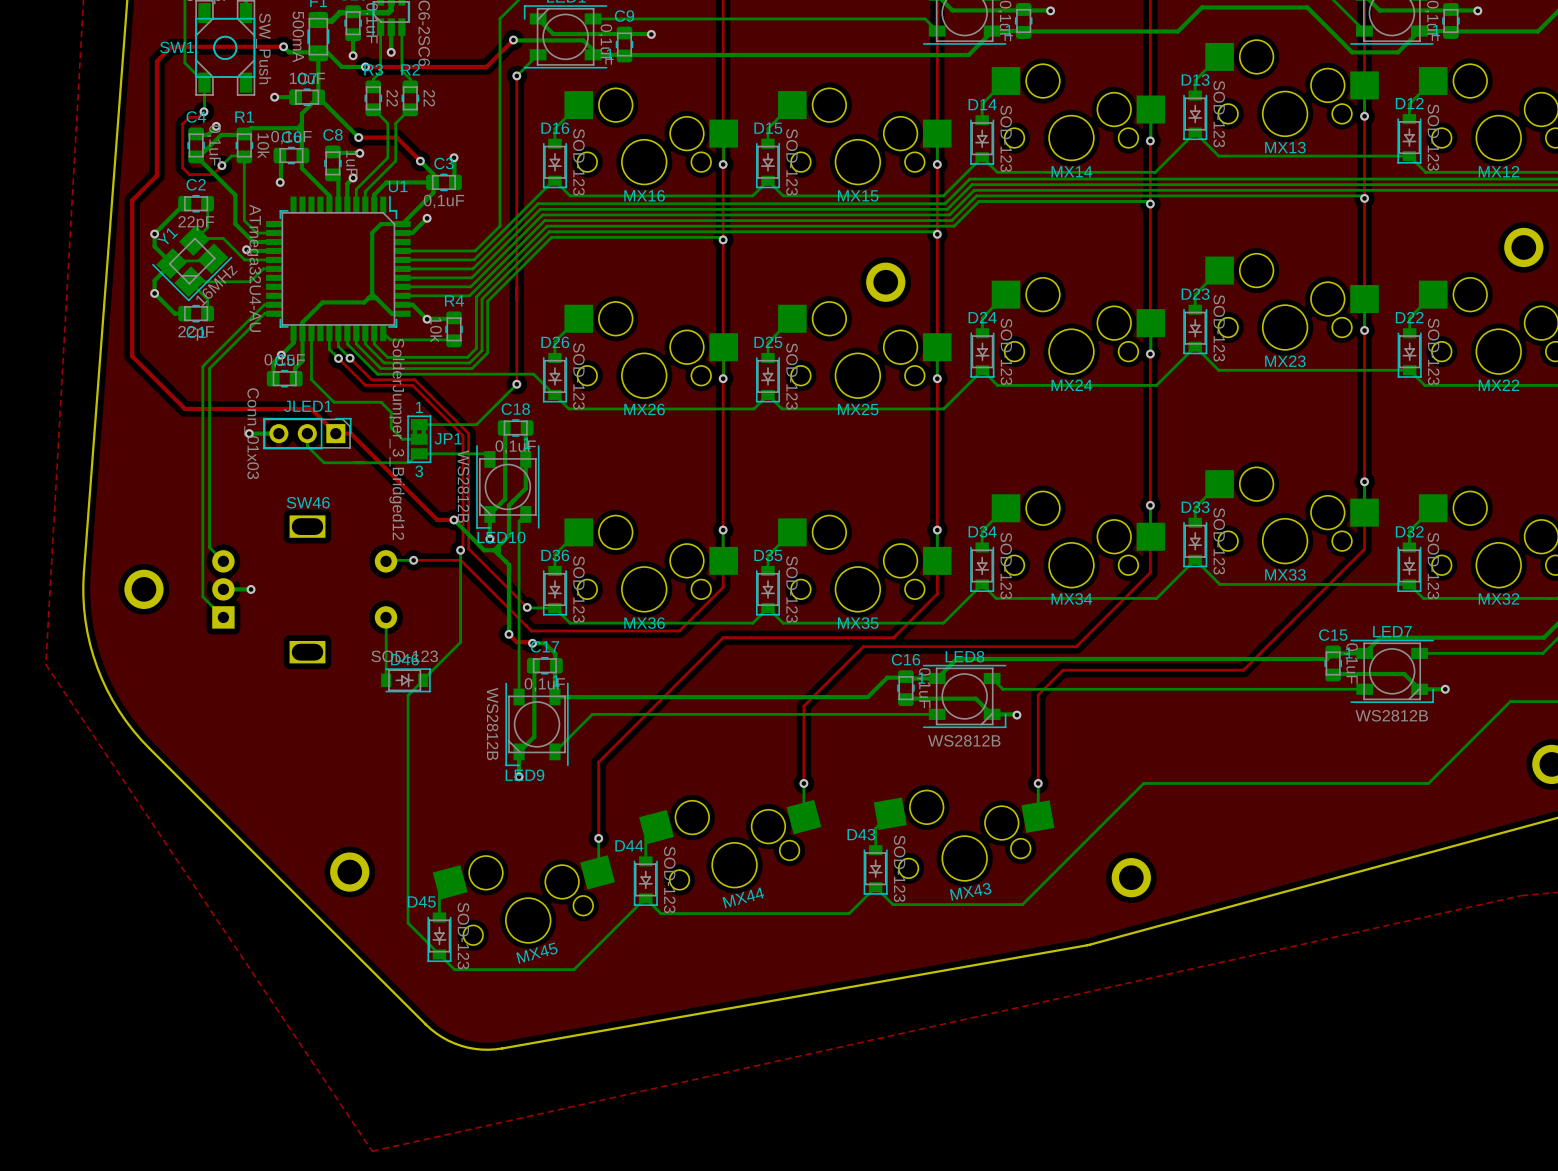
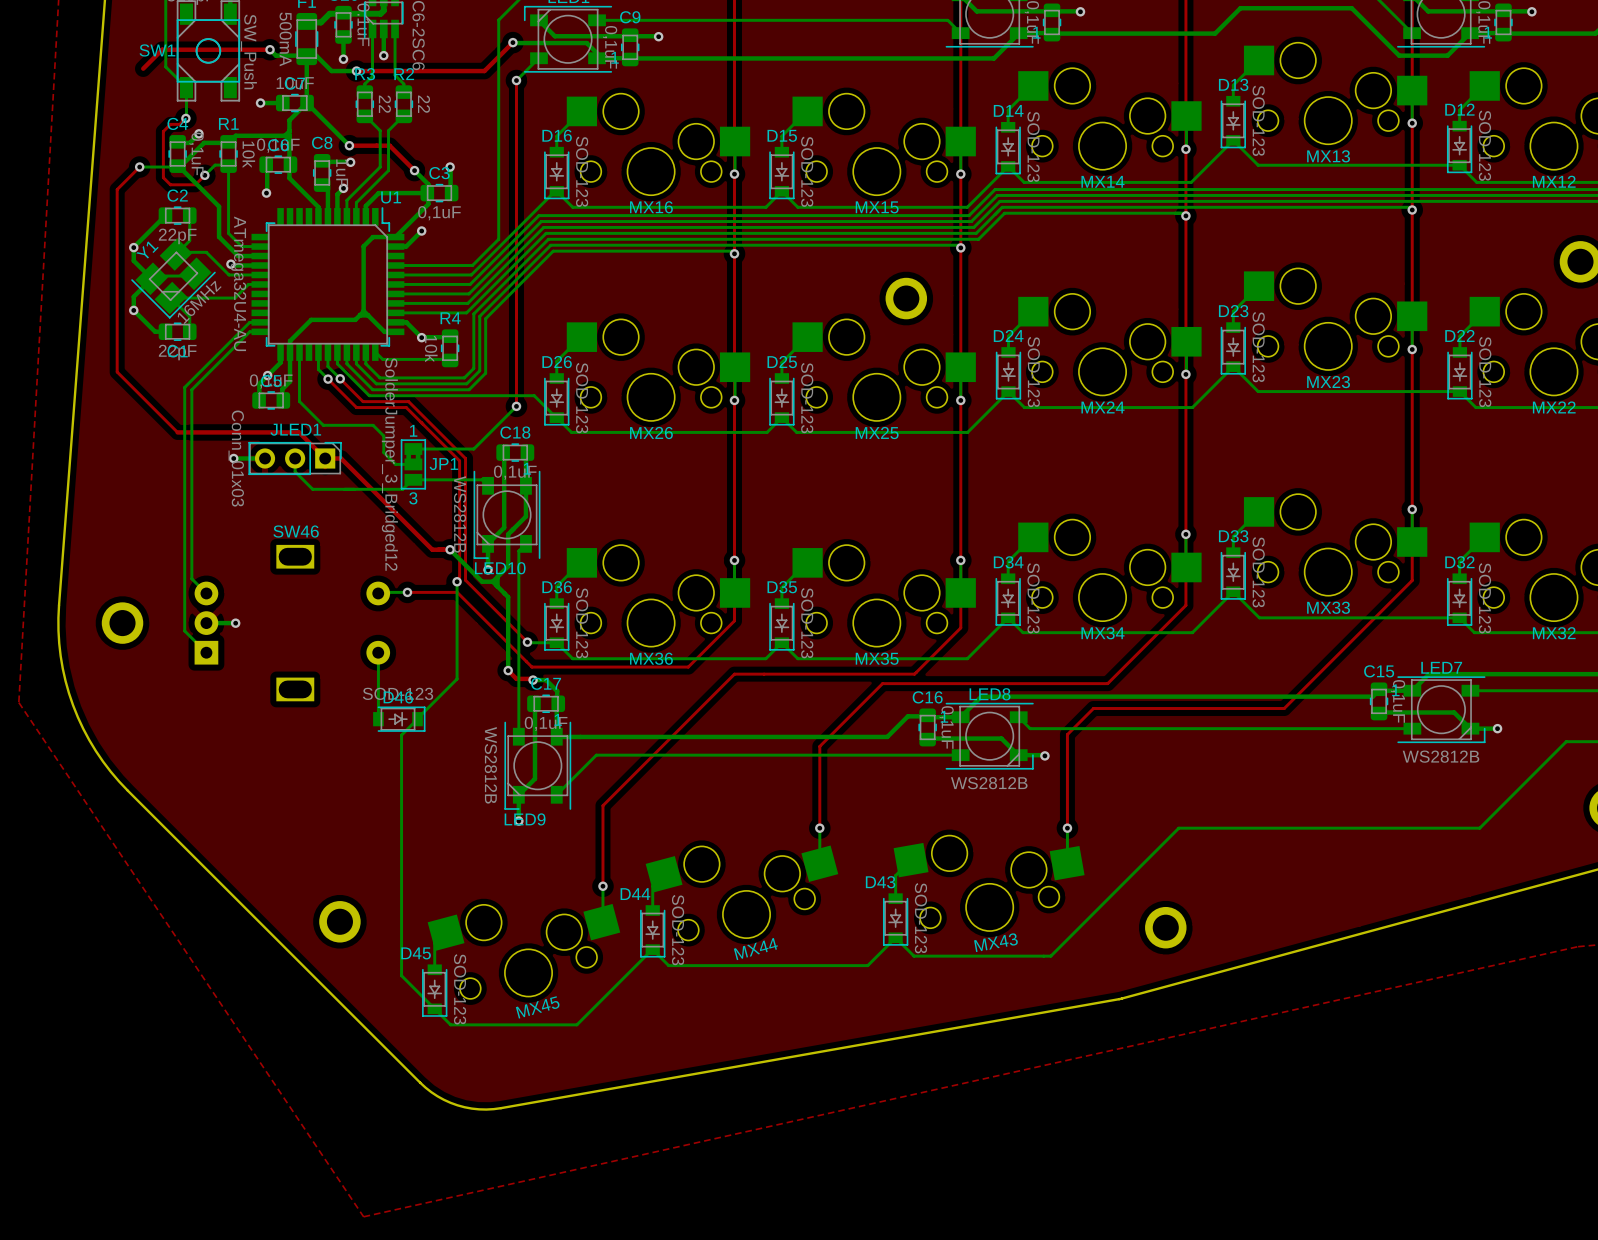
top track: (181, 46) (171, 46) (156, 61) (156, 175) (132, 200) (132, 356) (184, 408) (196, 408) -> (139, 167) (117, 189) (117, 372) (177, 432)
top track: none -> (162, 49) (143, 68)
via: none -> (139, 167)
bottom track: none -> (176, 167) (139, 167)

